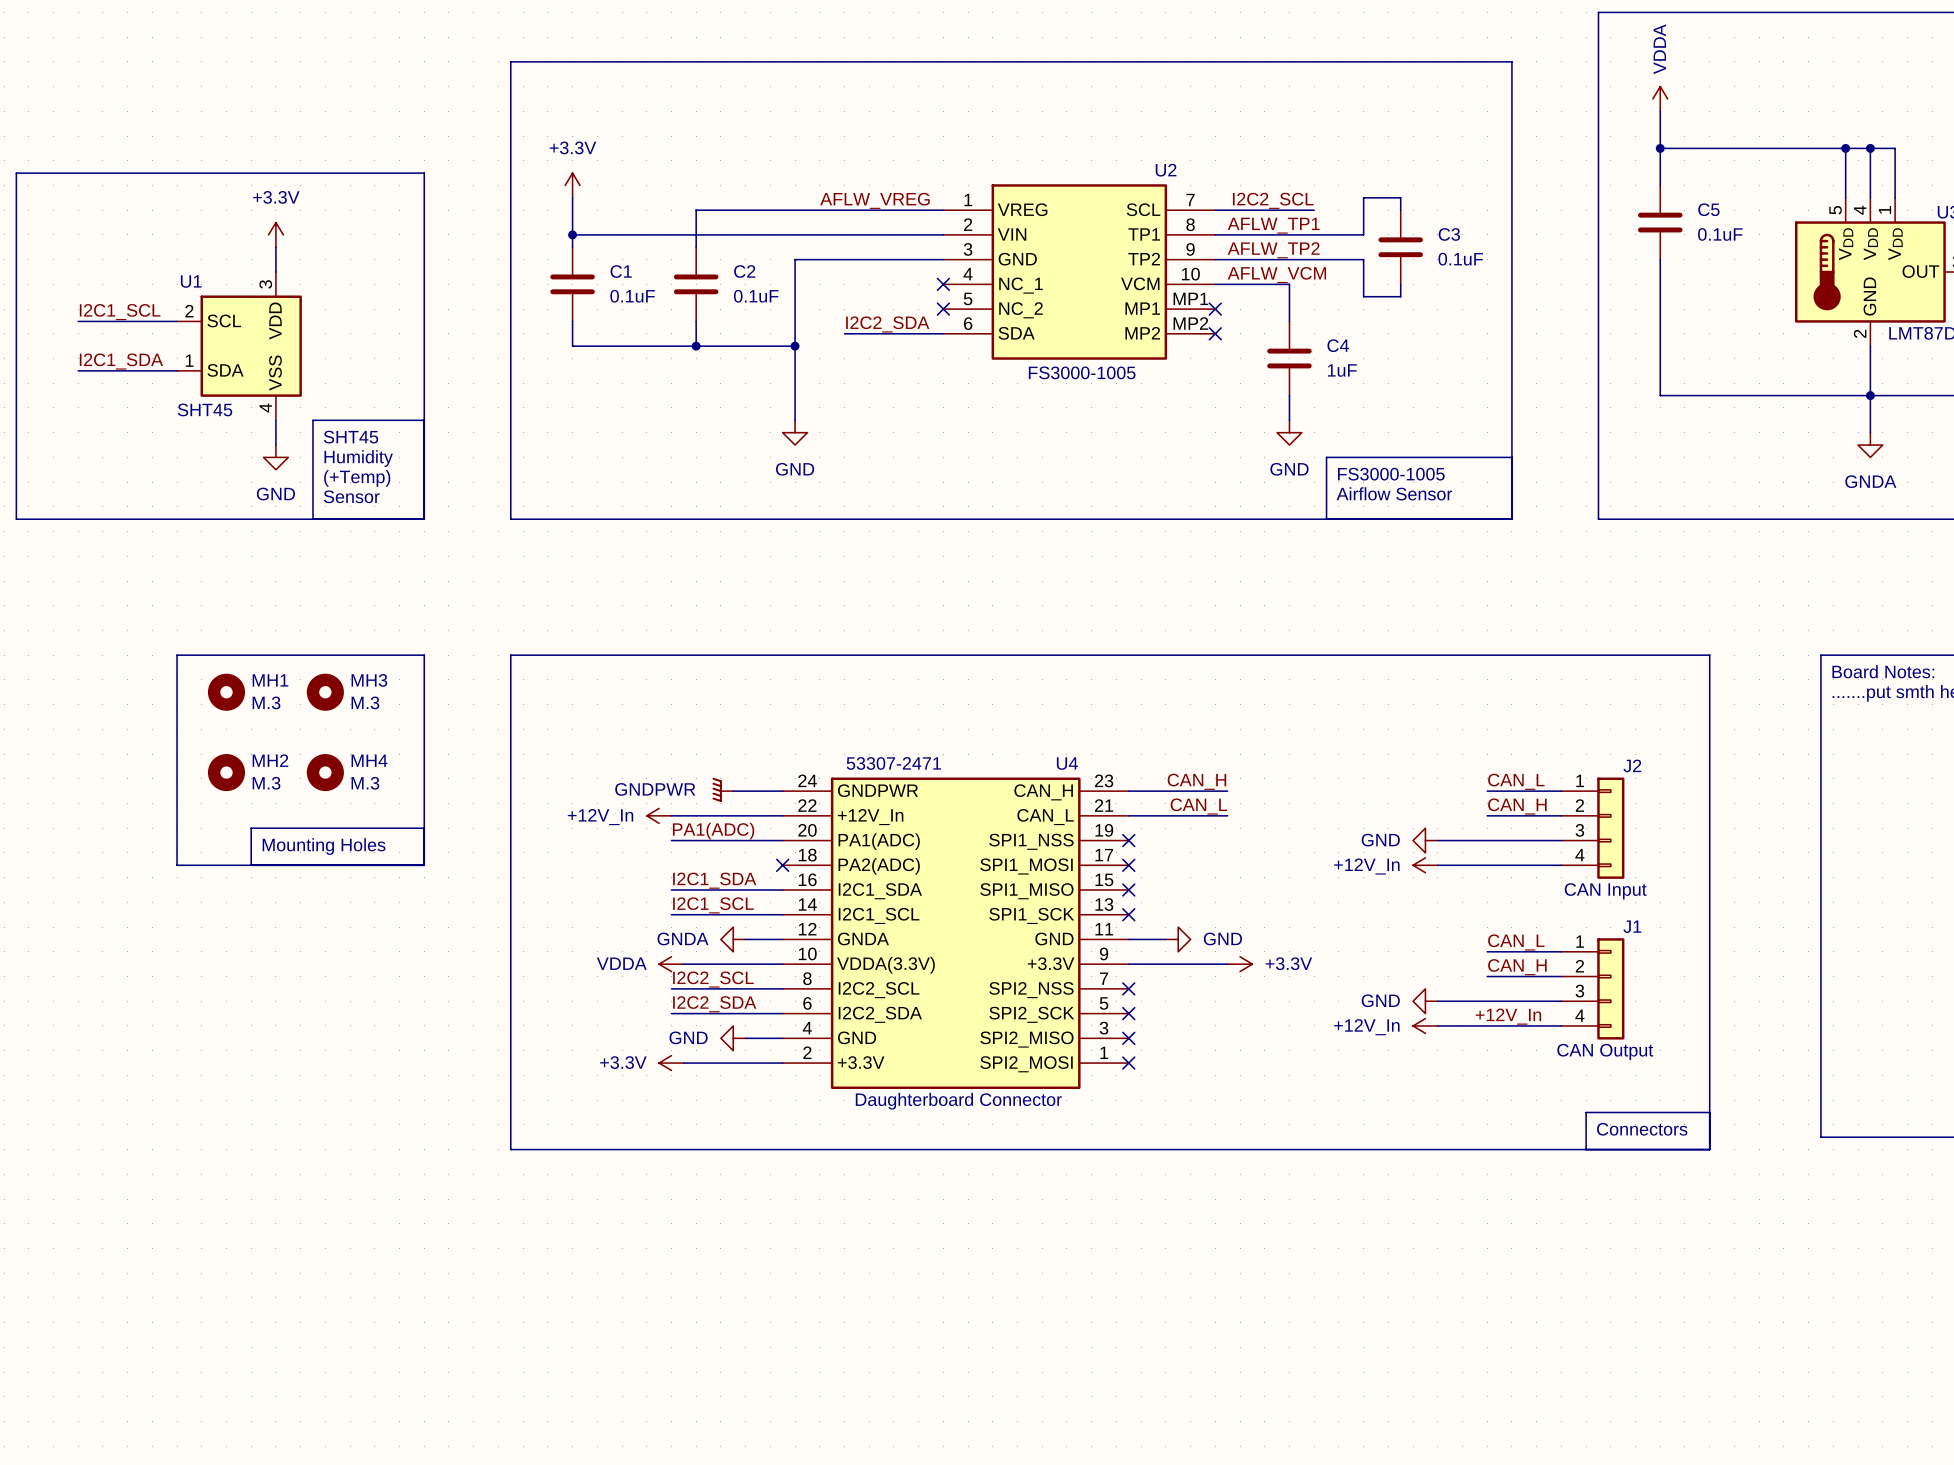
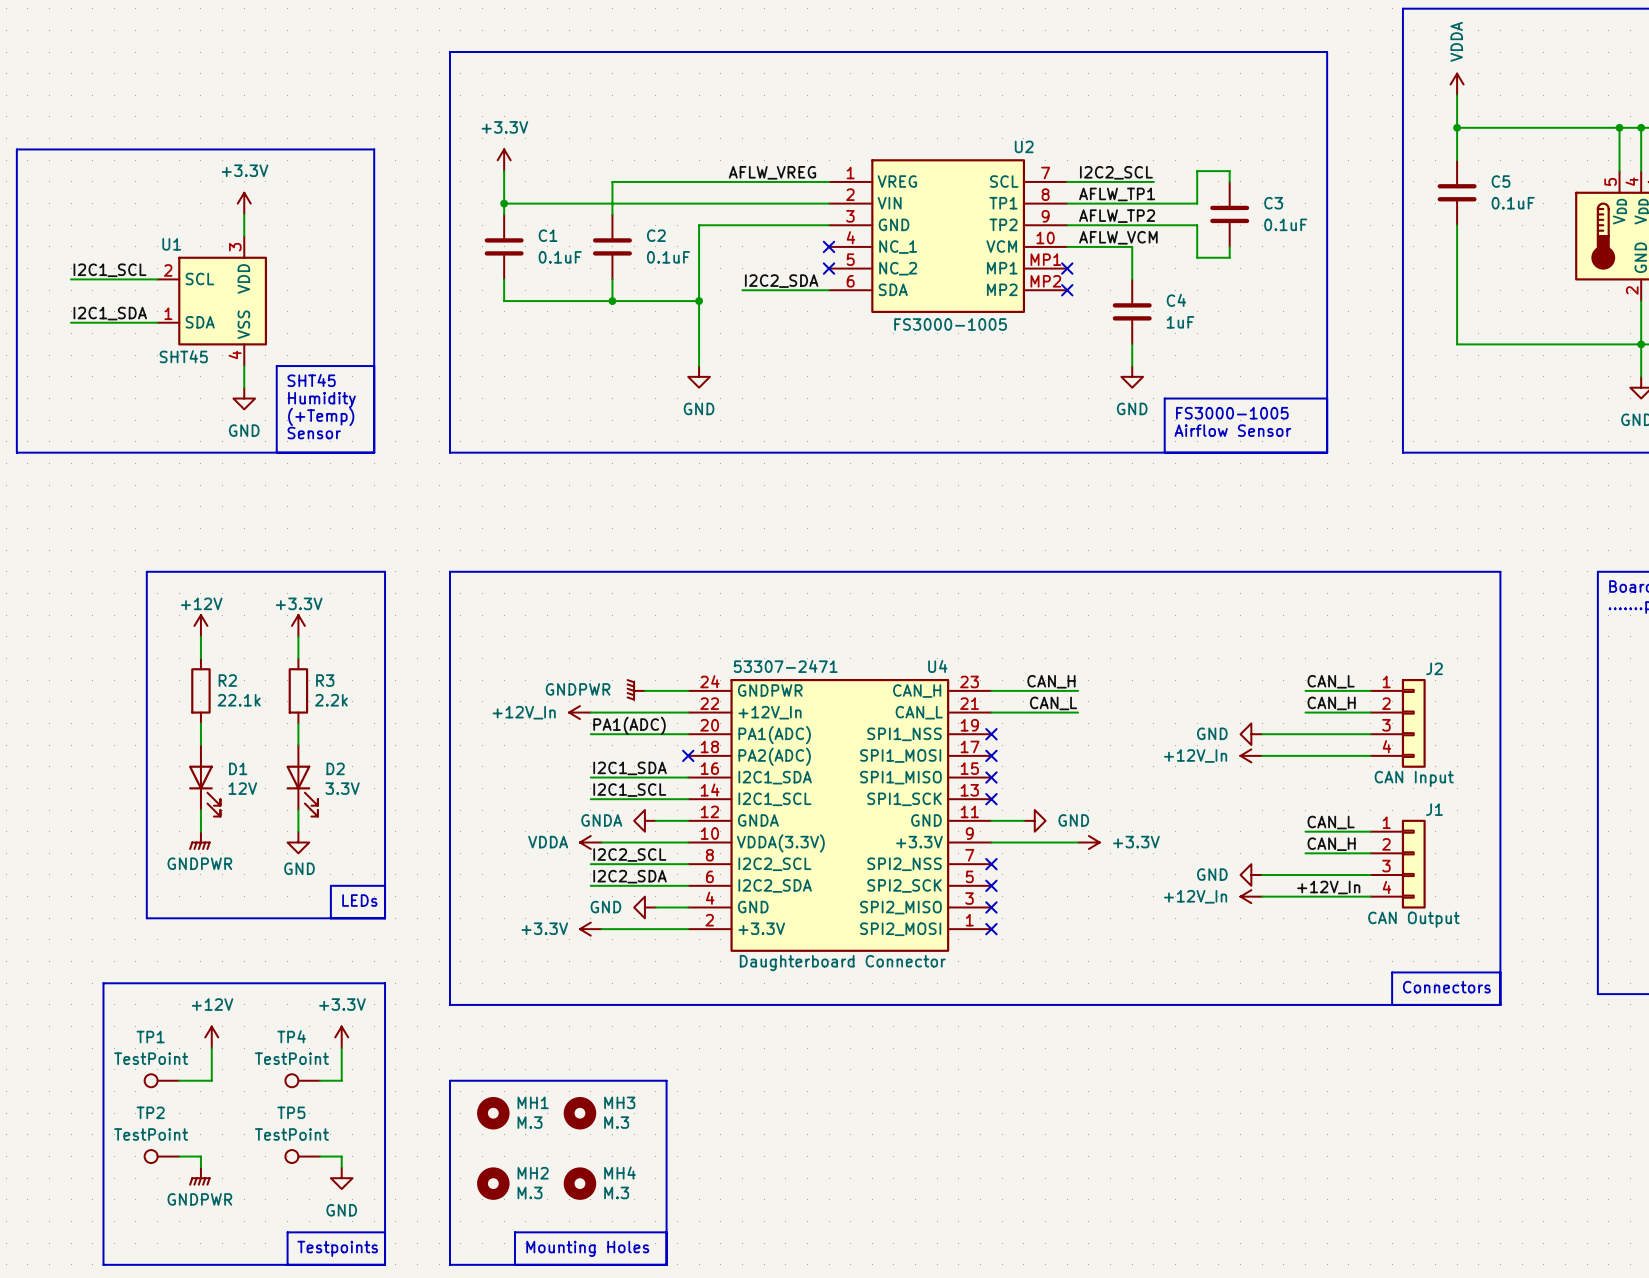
line: (177, 655) (177, 865) (424, 865) (424, 655) -> (157, 571) (146, 571) (146, 918) (385, 918) (385, 571) (374, 571)
MH1 position: (226, 692) -> (493, 1113)
MH3 position: (325, 692) -> (579, 1113)
power symbol: none -> +12V (200, 625)
power symbol: none -> +3.3V (298, 625)
wire: none -> (200, 636) (200, 658)
wire: none -> (298, 636) (298, 658)
MH2 position: (226, 772) -> (493, 1183)
MH4 position: (325, 772) -> (579, 1183)
R2: none -> 22.1k (200, 690)
R3: none -> 2.2k (298, 690)
wire: none -> (200, 723) (200, 745)
wire: none -> (298, 723) (298, 745)
line: (424, 828) (251, 828) (251, 865) -> none
text: Mounting Holes (324, 846) -> none
D1: none -> 12V (204, 780)
D2: none -> 3.3V (302, 780)
wire: none -> (200, 810) (200, 831)
wire: none -> (298, 810) (298, 831)
power symbol: none -> GNDPWR (199, 840)
power symbol: none -> GND (298, 842)
line: none -> (385, 885) (330, 885) (330, 918)
text: none -> LEDs (359, 900)
line: none -> (103, 983) (385, 983) (385, 1264) (103, 1264) (103, 983)
power symbol: none -> +12V (211, 1037)
power symbol: none -> +3.3V (341, 1037)
wire: none -> (211, 1048) (211, 1080) (179, 1080)
wire: none -> (341, 1048) (341, 1080) (320, 1080)
TP1: none -> TestPoint (161, 1080)
TP4: none -> TestPoint (302, 1080)
line: none -> (450, 1080) (666, 1080) (666, 1264) (450, 1264) (450, 1080)
TP2: none -> TestPoint (161, 1156)
wire: none -> (179, 1156) (200, 1156) (200, 1167)
TP5: none -> TestPoint (302, 1156)
wire: none -> (320, 1156) (341, 1156) (341, 1167)
power symbol: none -> GNDPWR (199, 1176)
power symbol: none -> GND (341, 1178)
line: none -> (385, 1232) (287, 1232) (287, 1264)
line: none -> (666, 1232) (514, 1232) (514, 1264)
text: none -> Testpoints (337, 1248)
text: none -> Mounting Holes (587, 1248)

